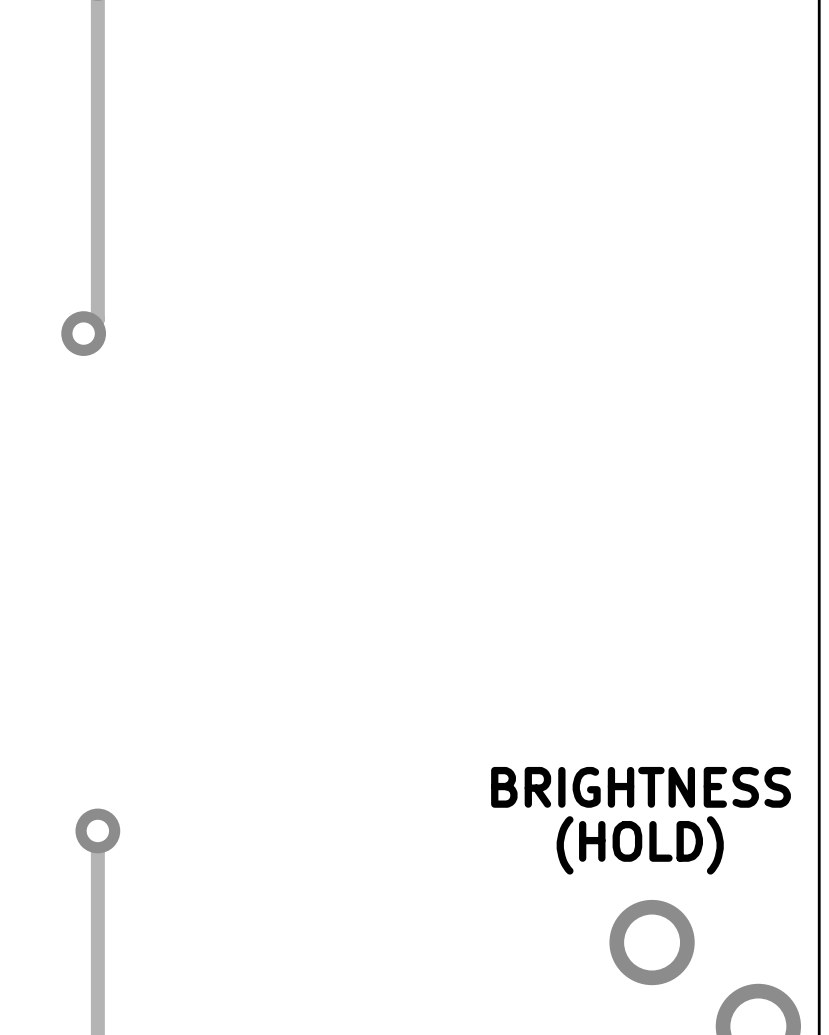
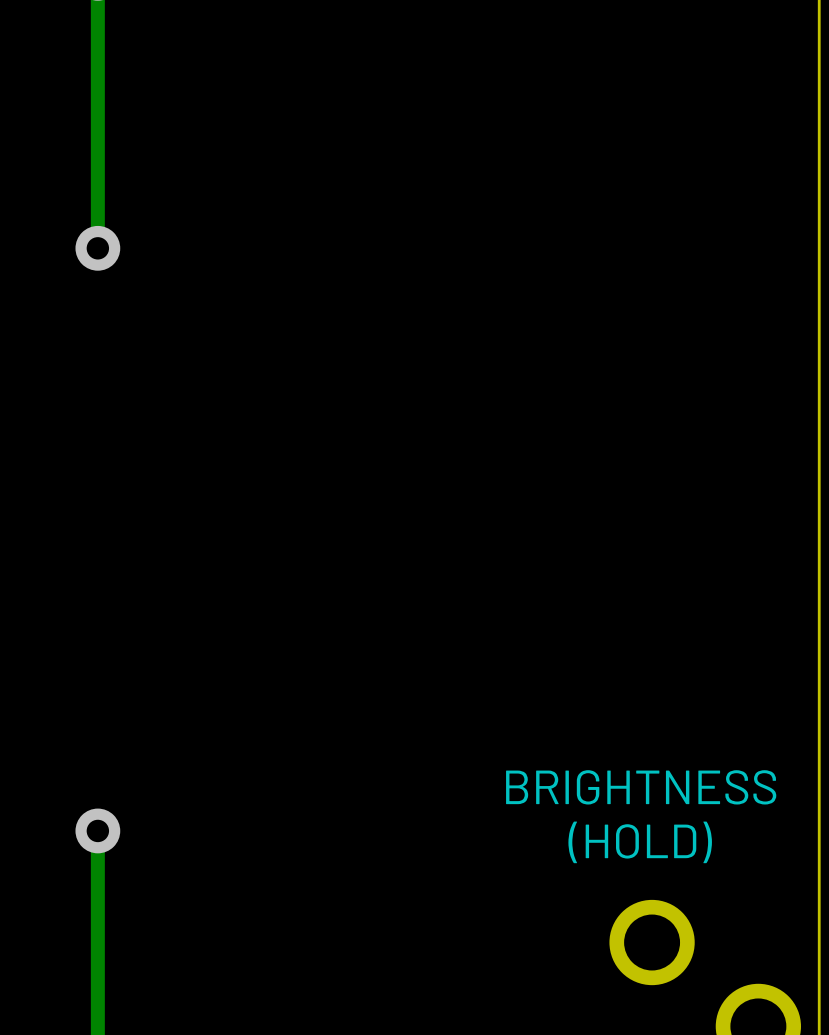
track: (97, 248) (97, 319) (83, 333) -> none
via position: (83, 333) -> (97, 248)

